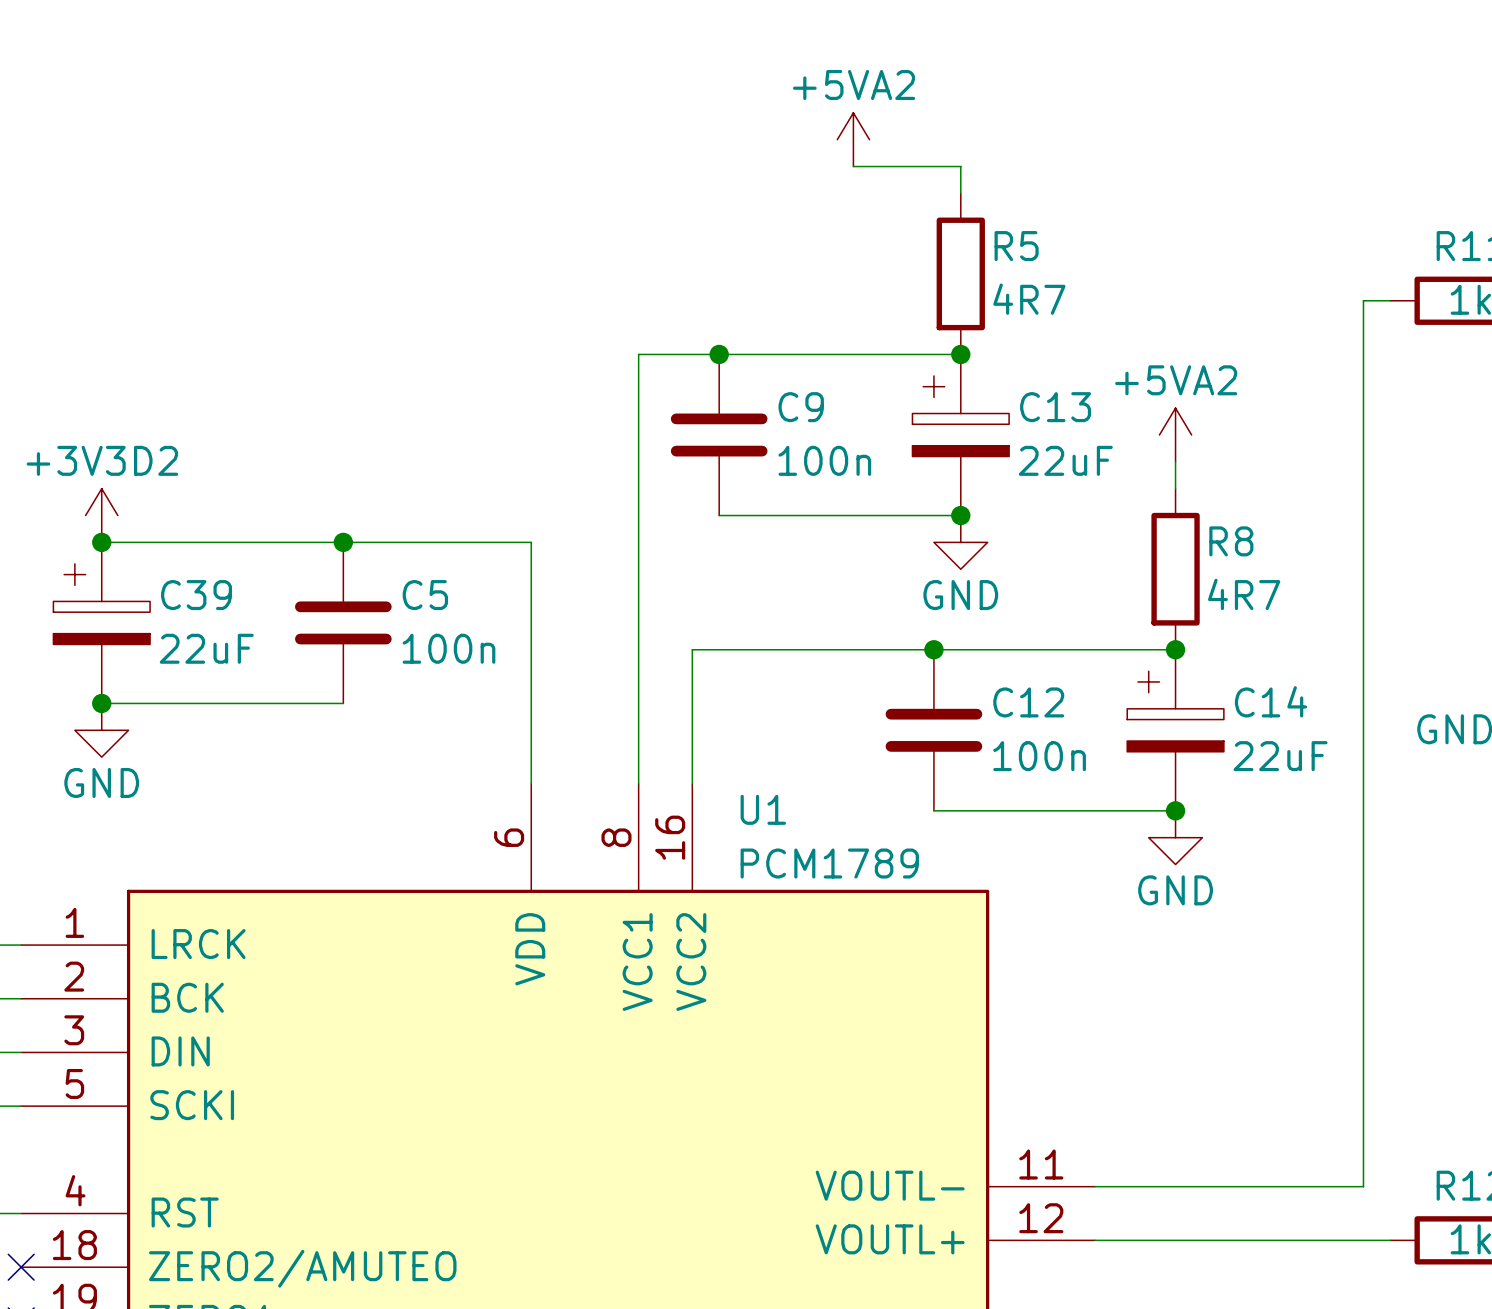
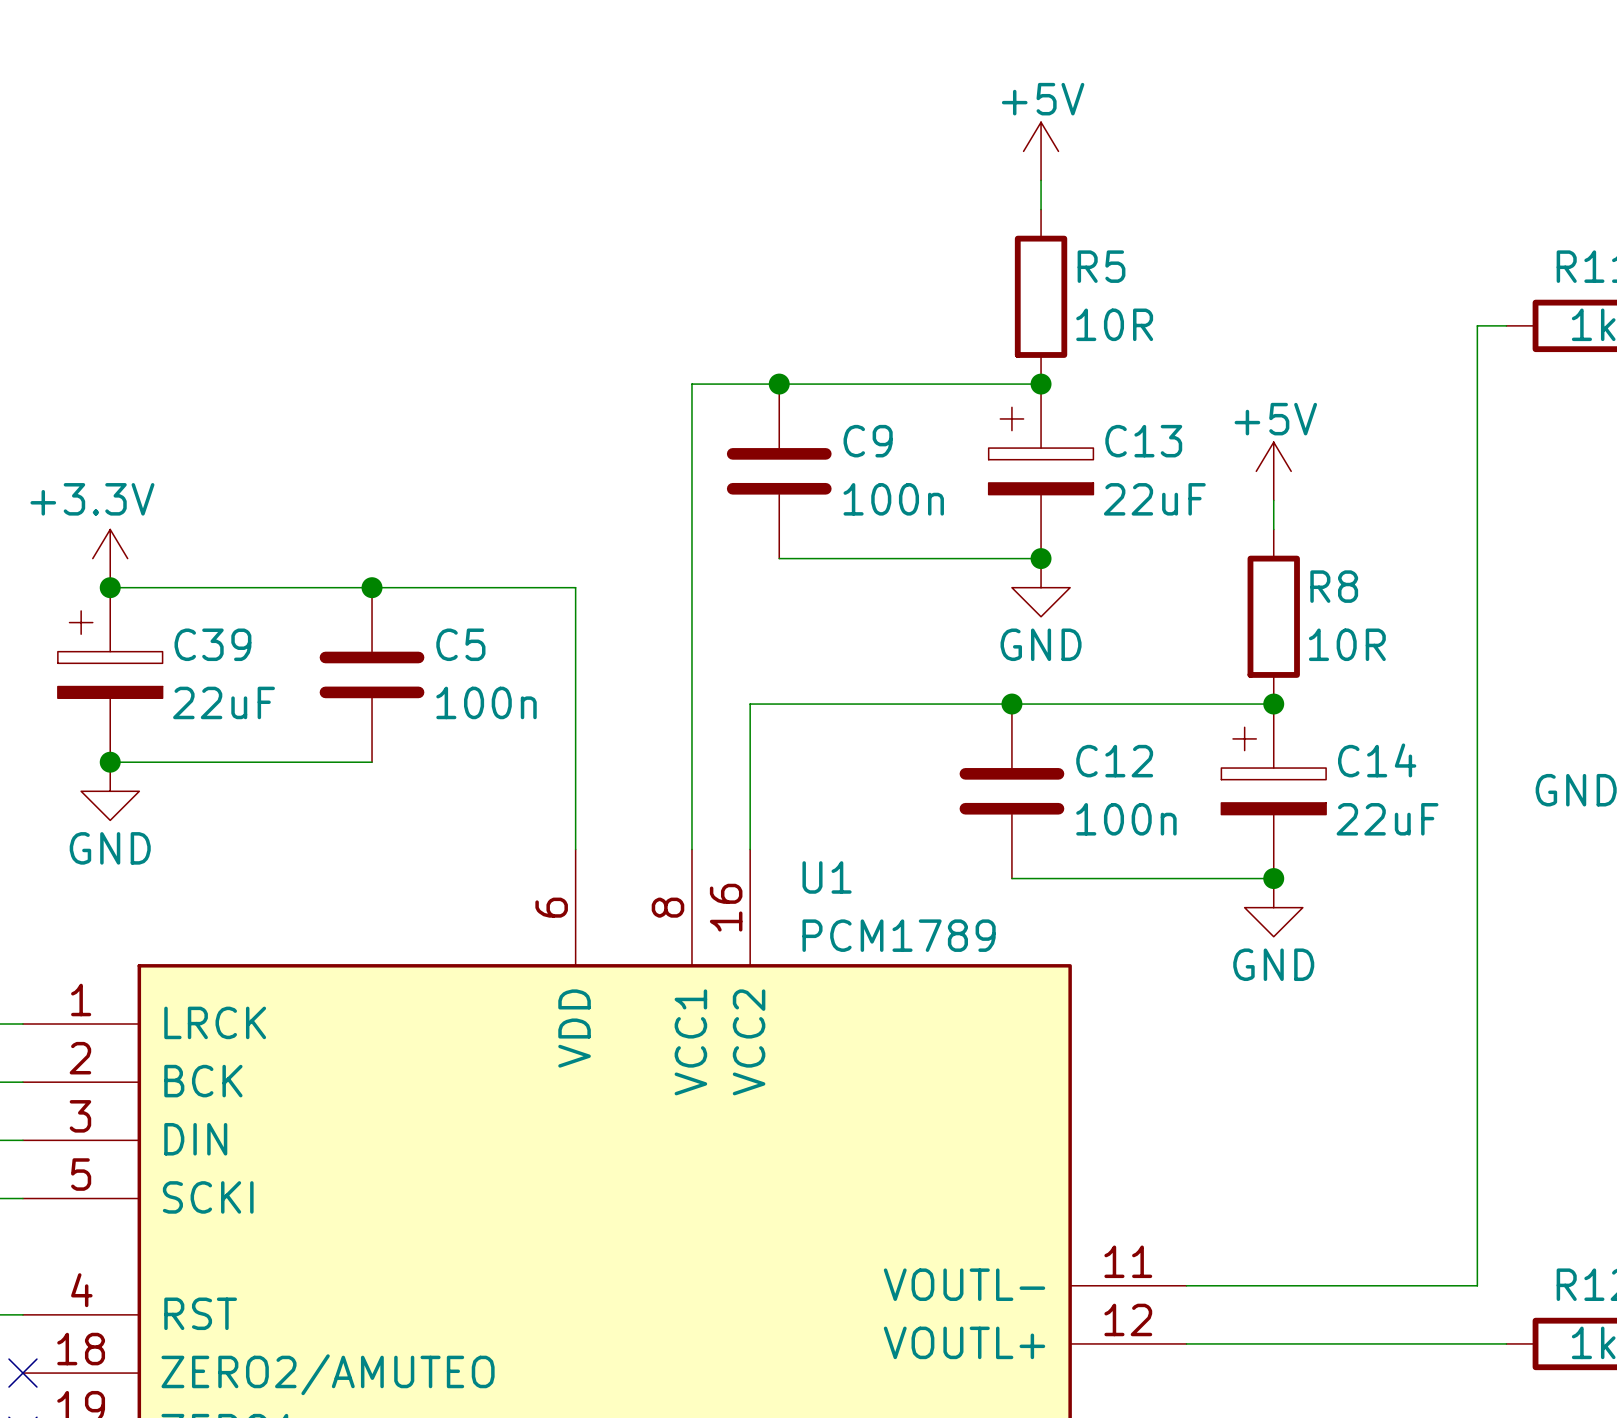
power symbol: +5VA2 (853, 139) -> none
power symbol: none -> +5V (1041, 151)
wire: (853, 166) (960, 166) -> none
R5 value: 4R7 (1029, 299) -> 10R (1114, 324)
power symbol: +5VA2 (1175, 435) -> +5V (1273, 471)
power symbol: +3V3D2 (101, 515) -> +3.3V (110, 558)
R8 value: 4R7 (1244, 594) -> 10R (1347, 644)

